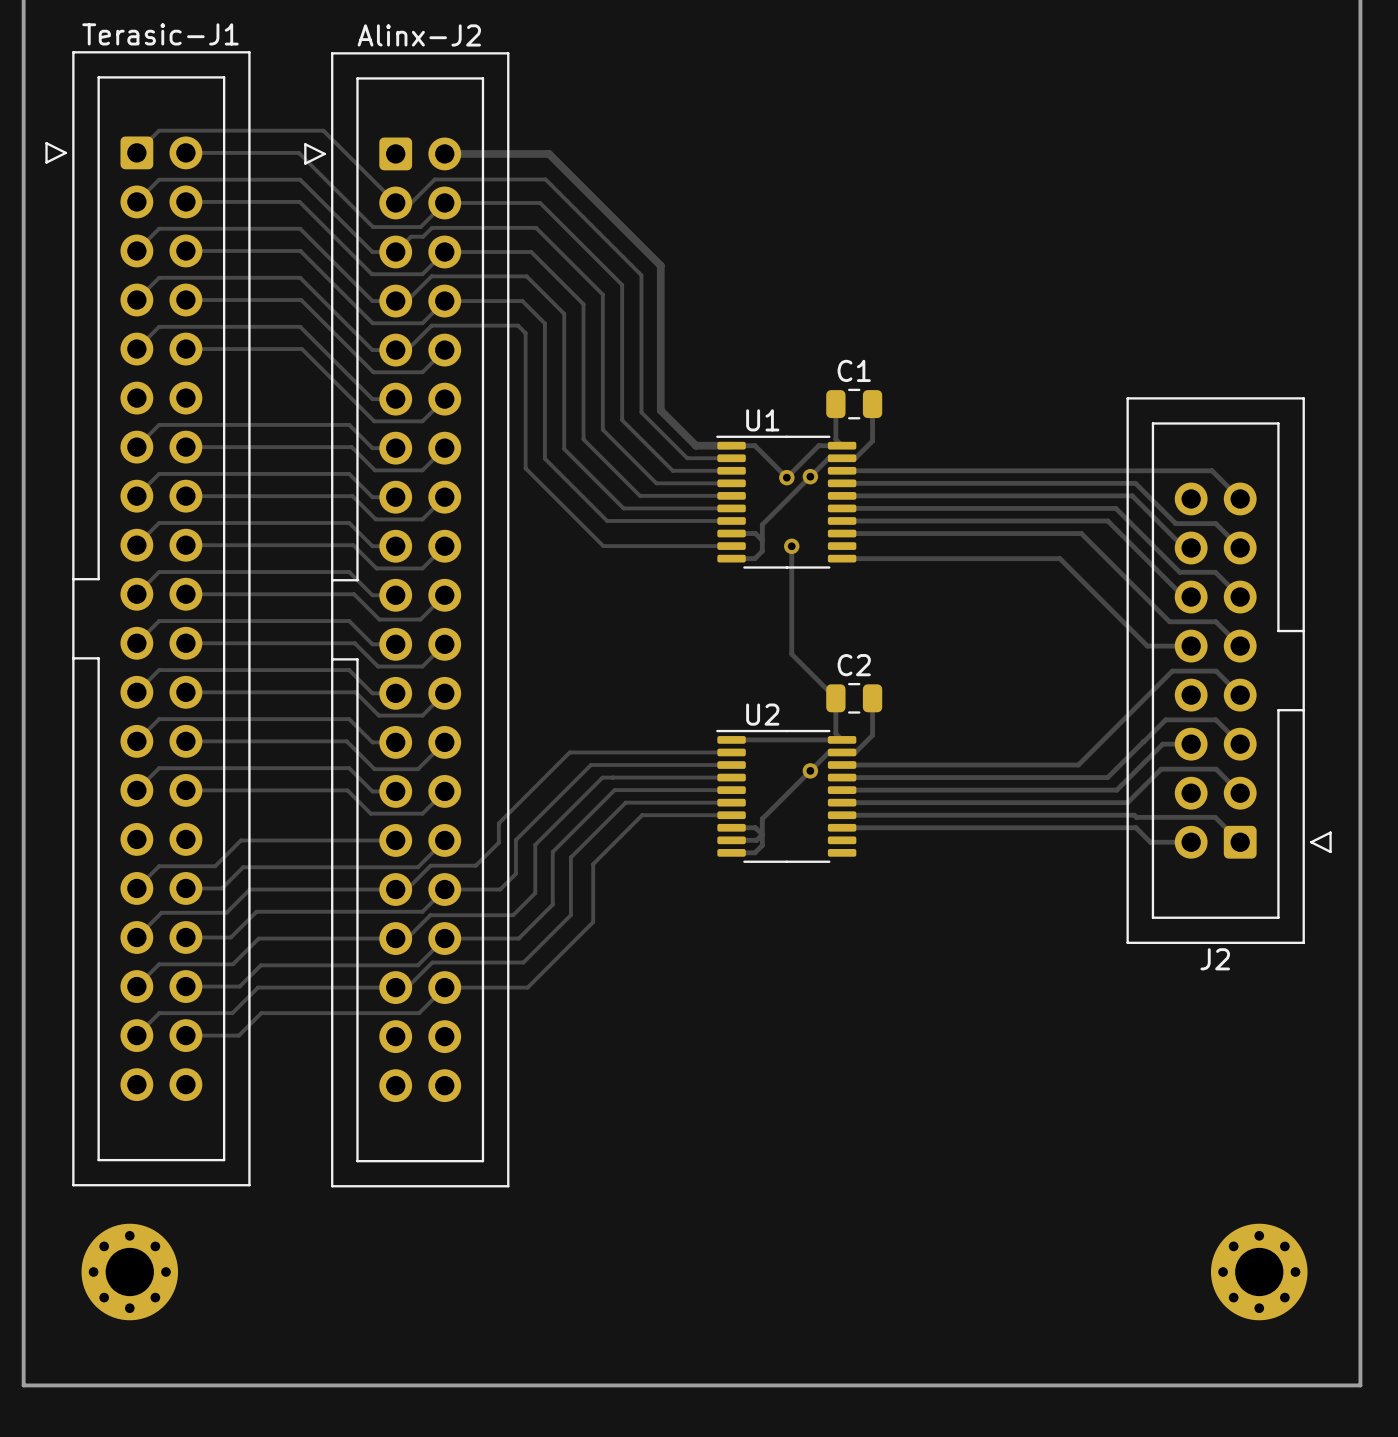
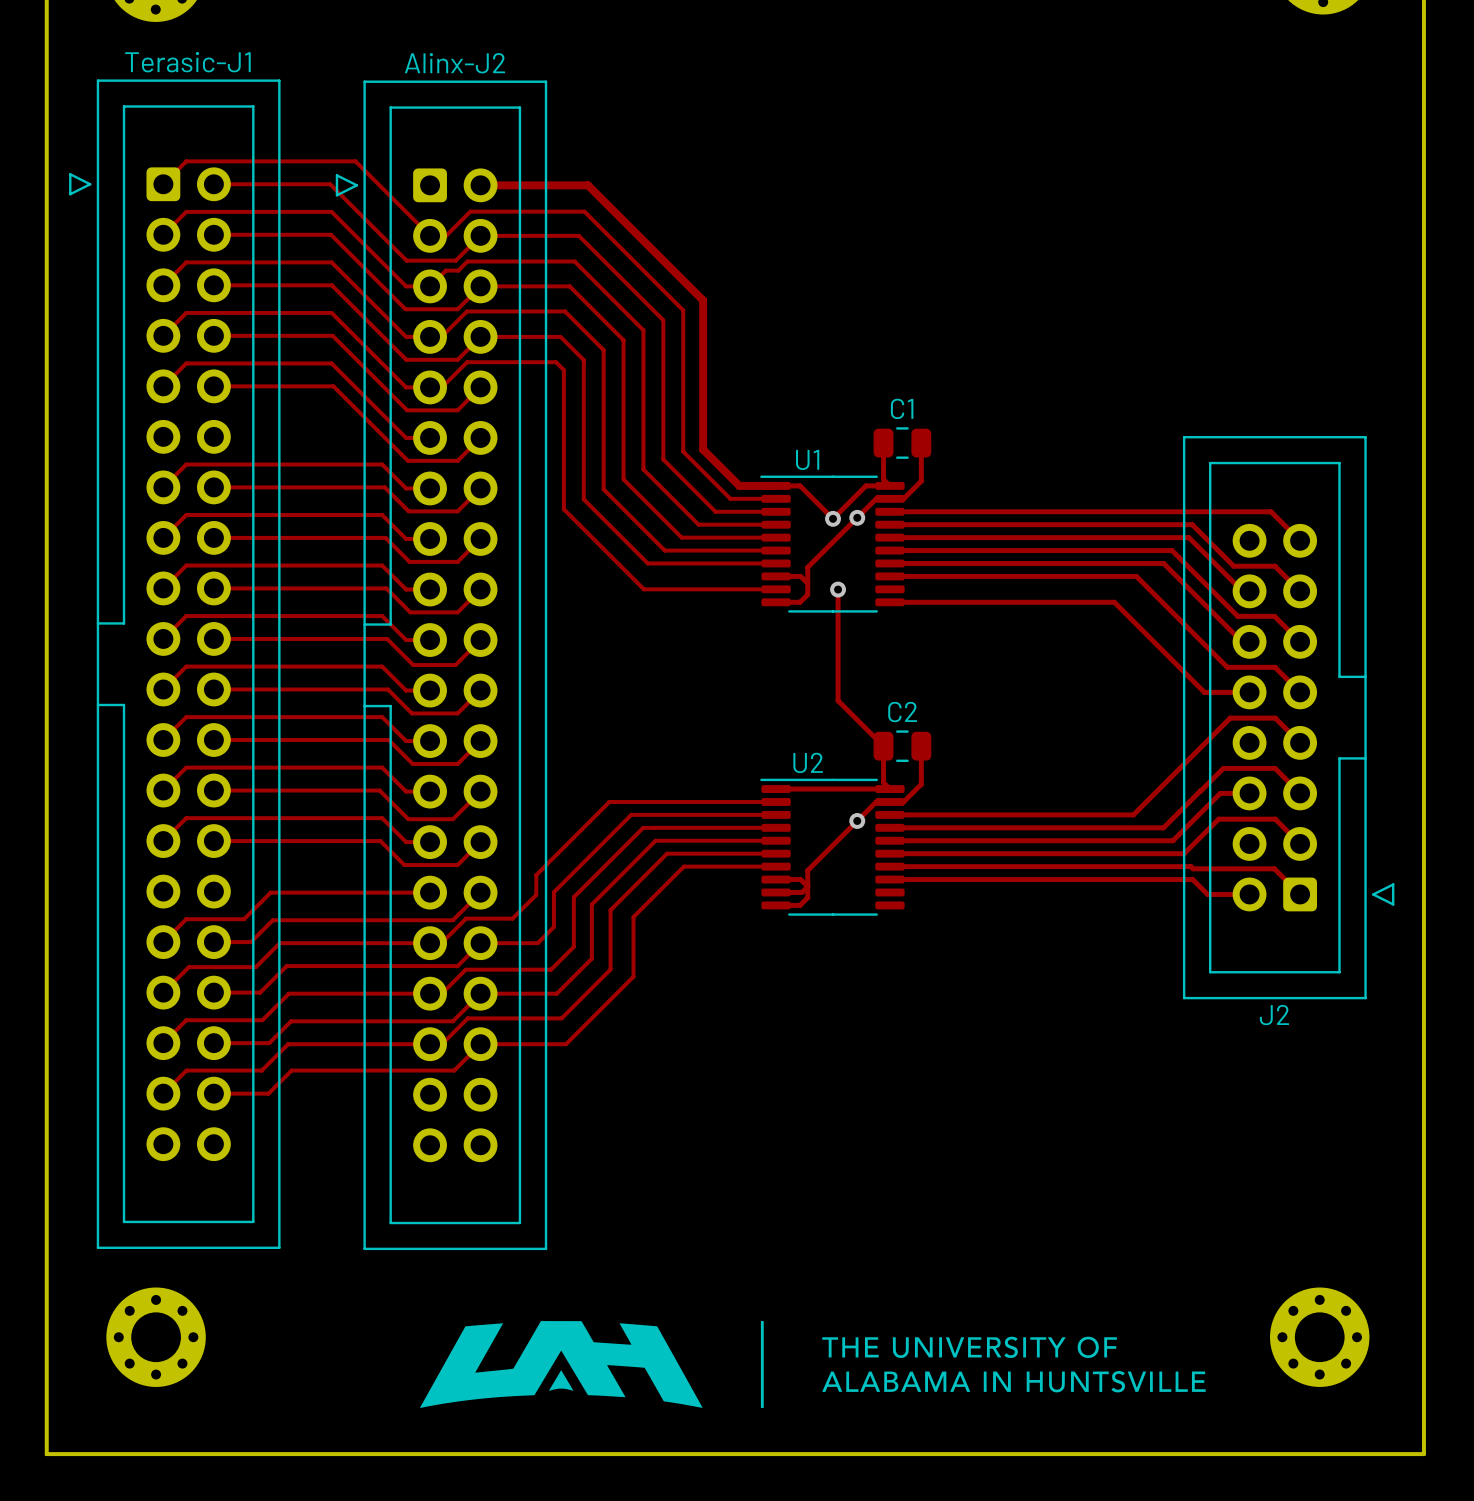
drawing: none -> [420, 1321, 1206, 1408]

